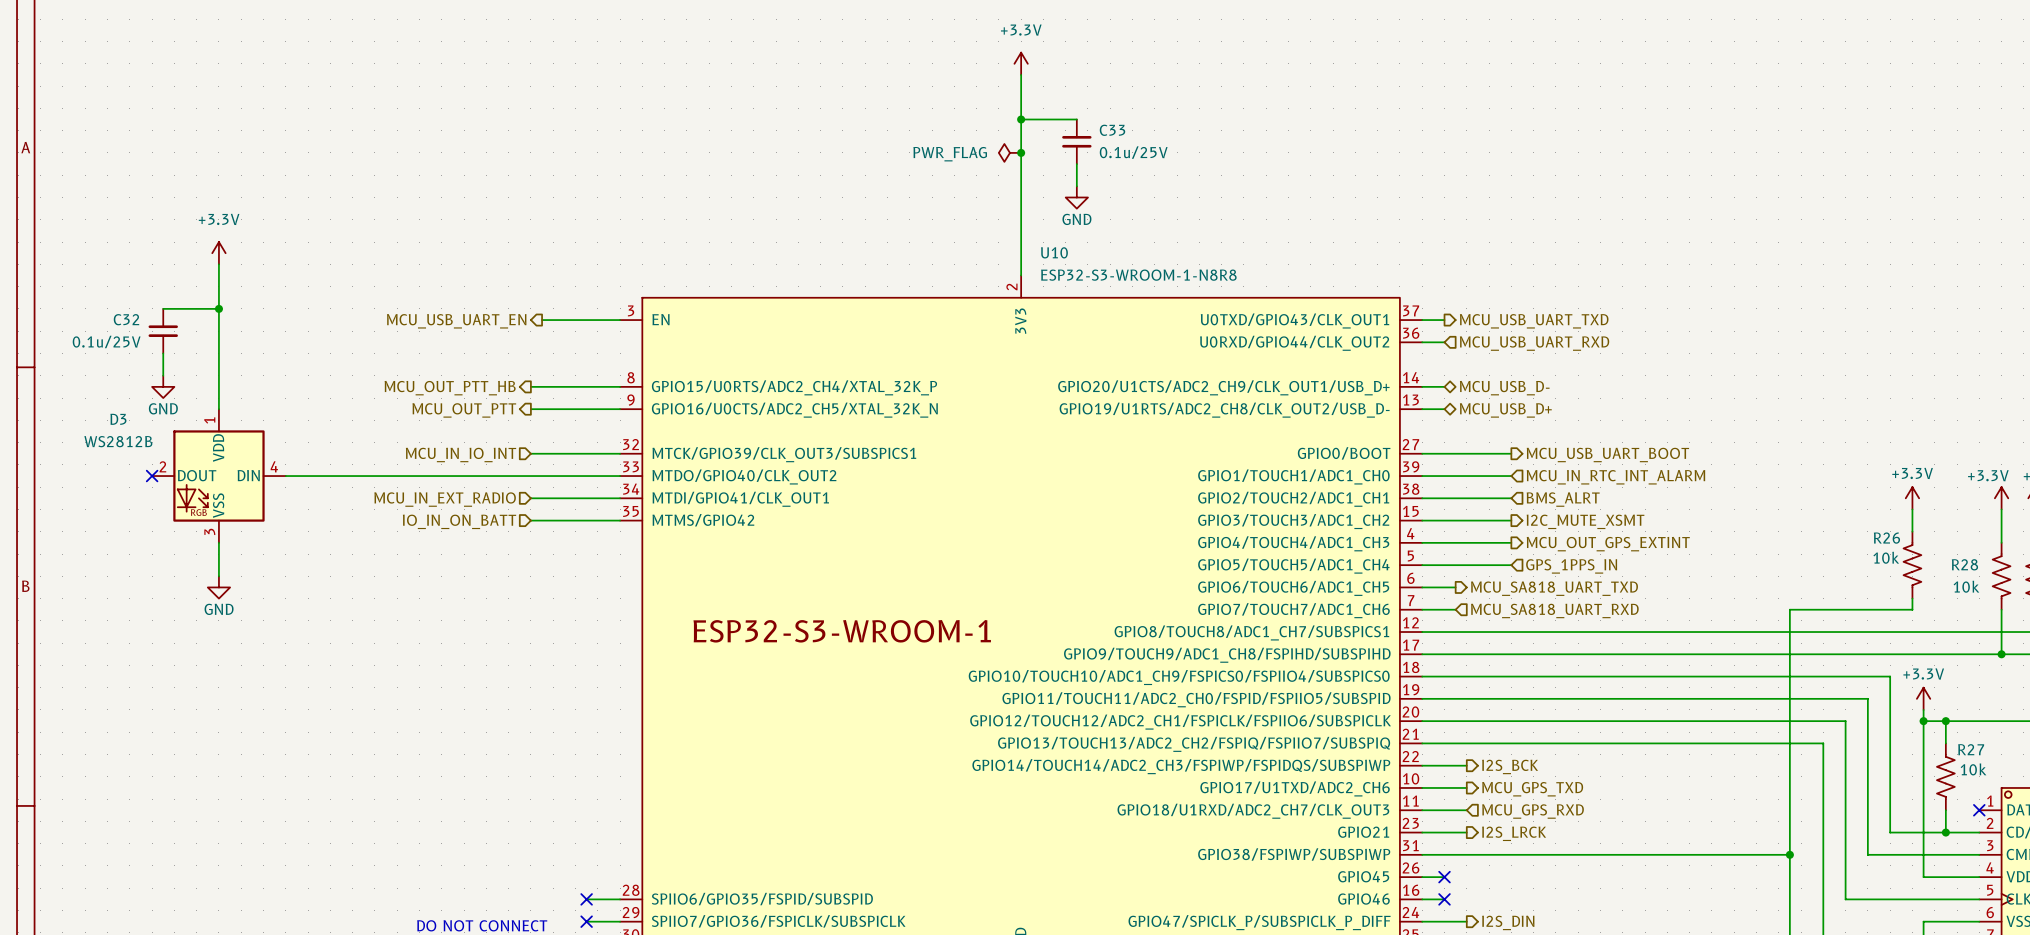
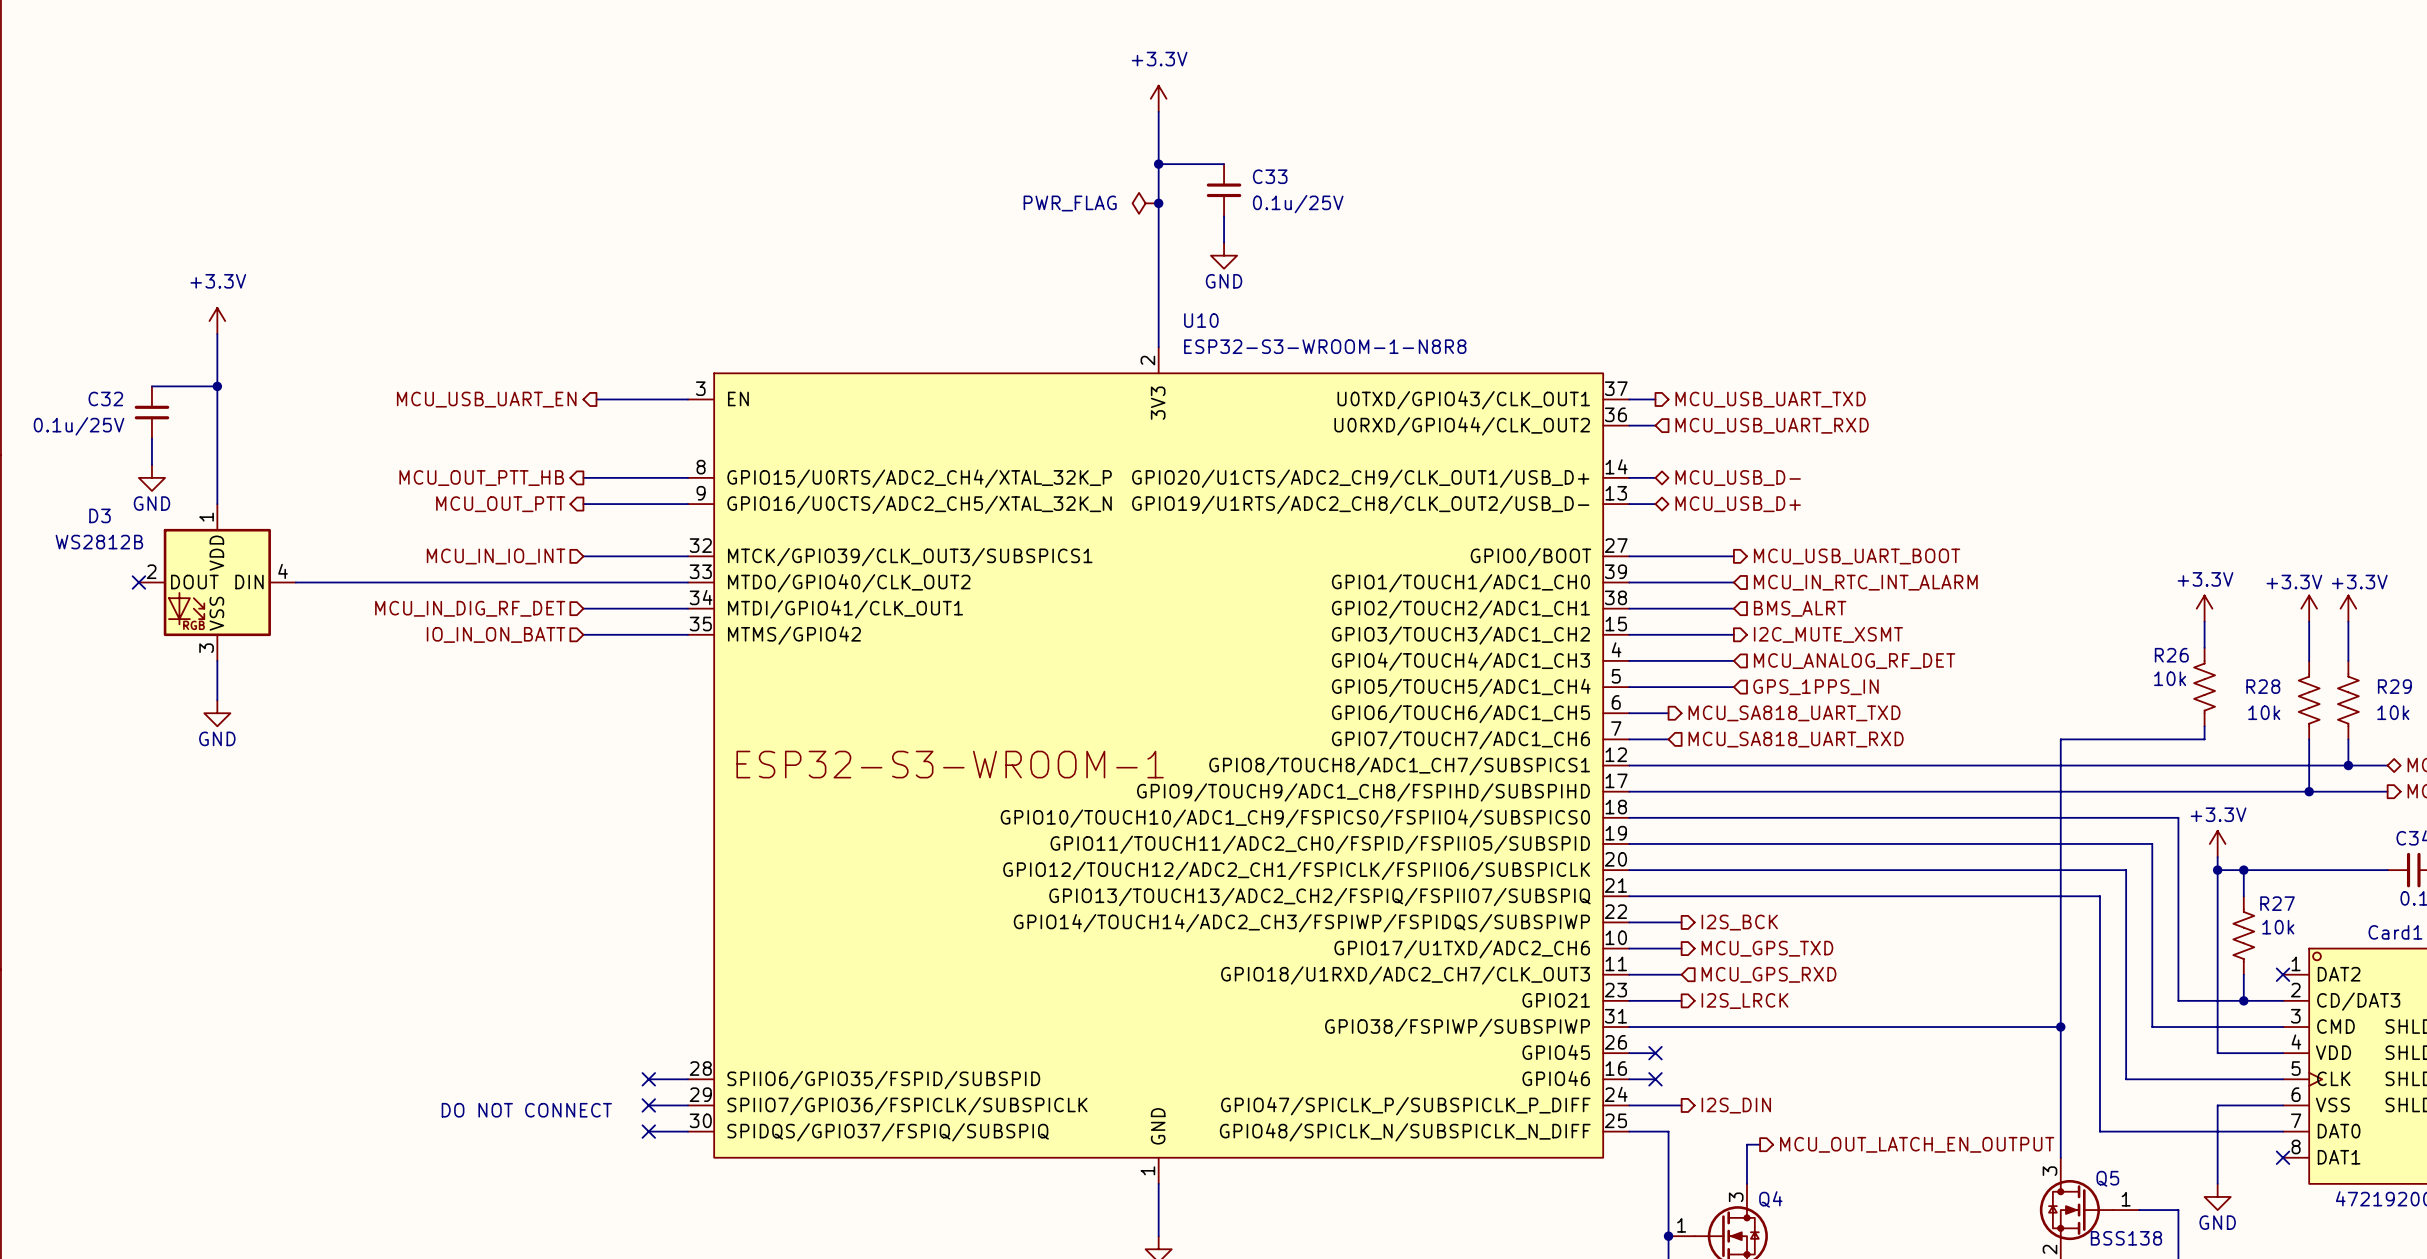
hierarchical label: MCU_IN_EXT_RADIO (445, 499) -> MCU_IN_DIG_RF_DET (470, 608)
hierarchical label shape: output (1608, 544) -> input (1854, 661)
hierarchical label: MCU_OUT_GPS_EXTINT (1608, 544) -> MCU_ANALOG_RF_DET (1854, 661)

